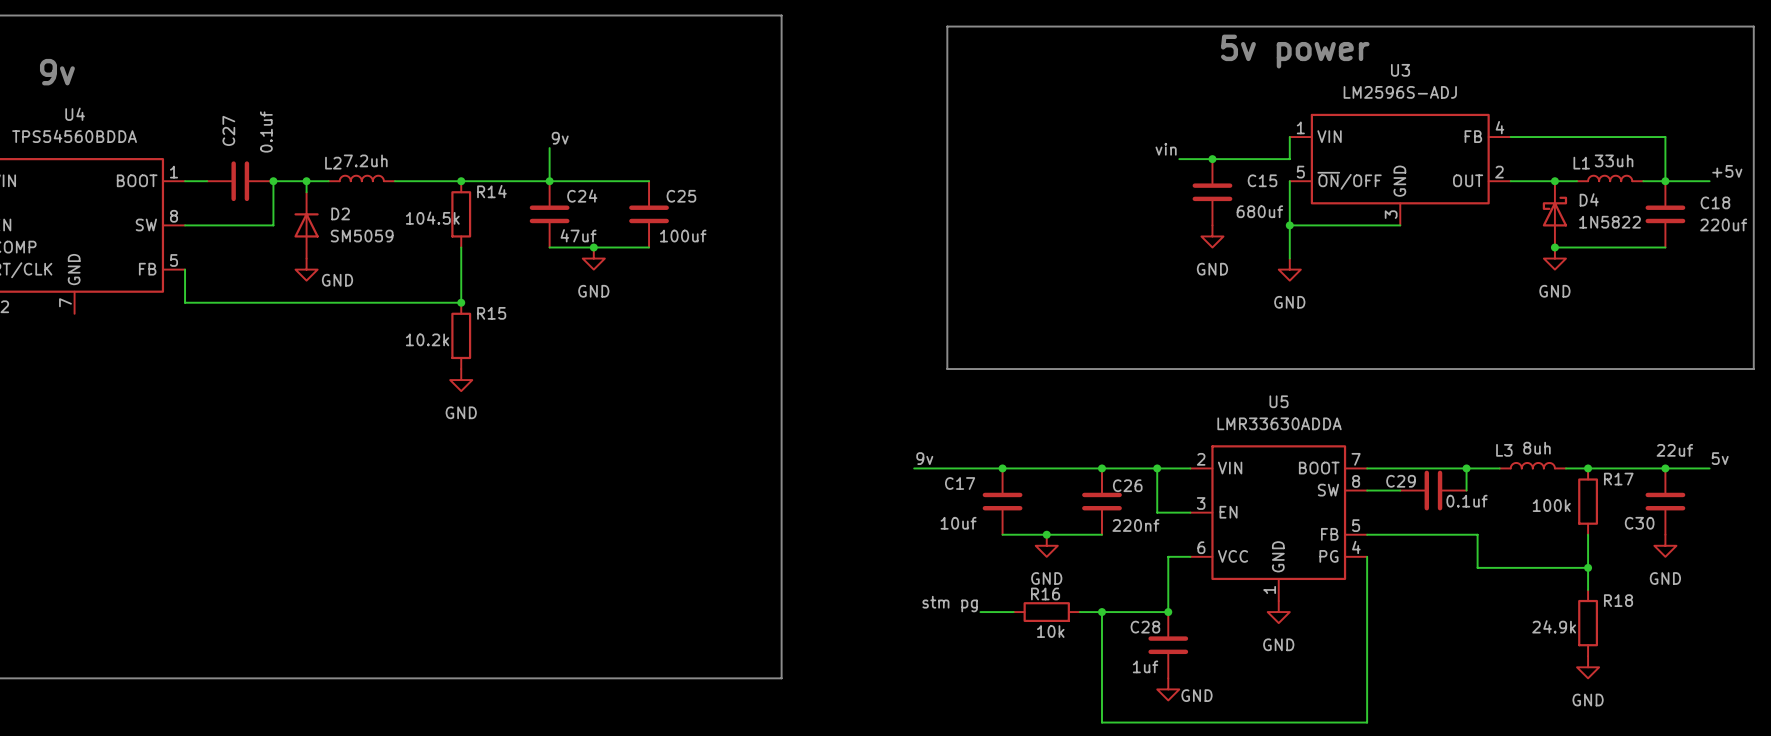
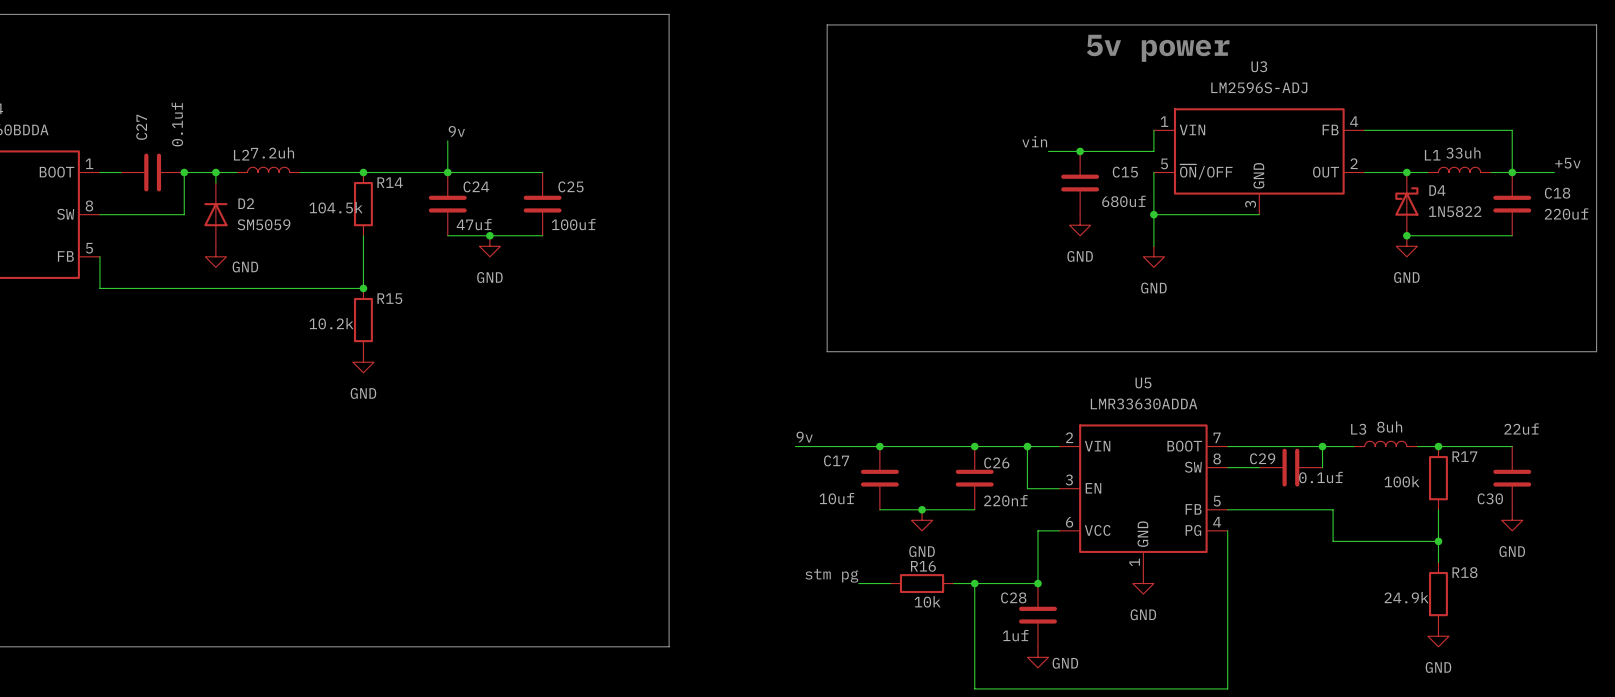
label: 5v (1720, 458) -> none
wire: (1665, 468) (1709, 468) -> none
junction: (1665, 468) -> none

